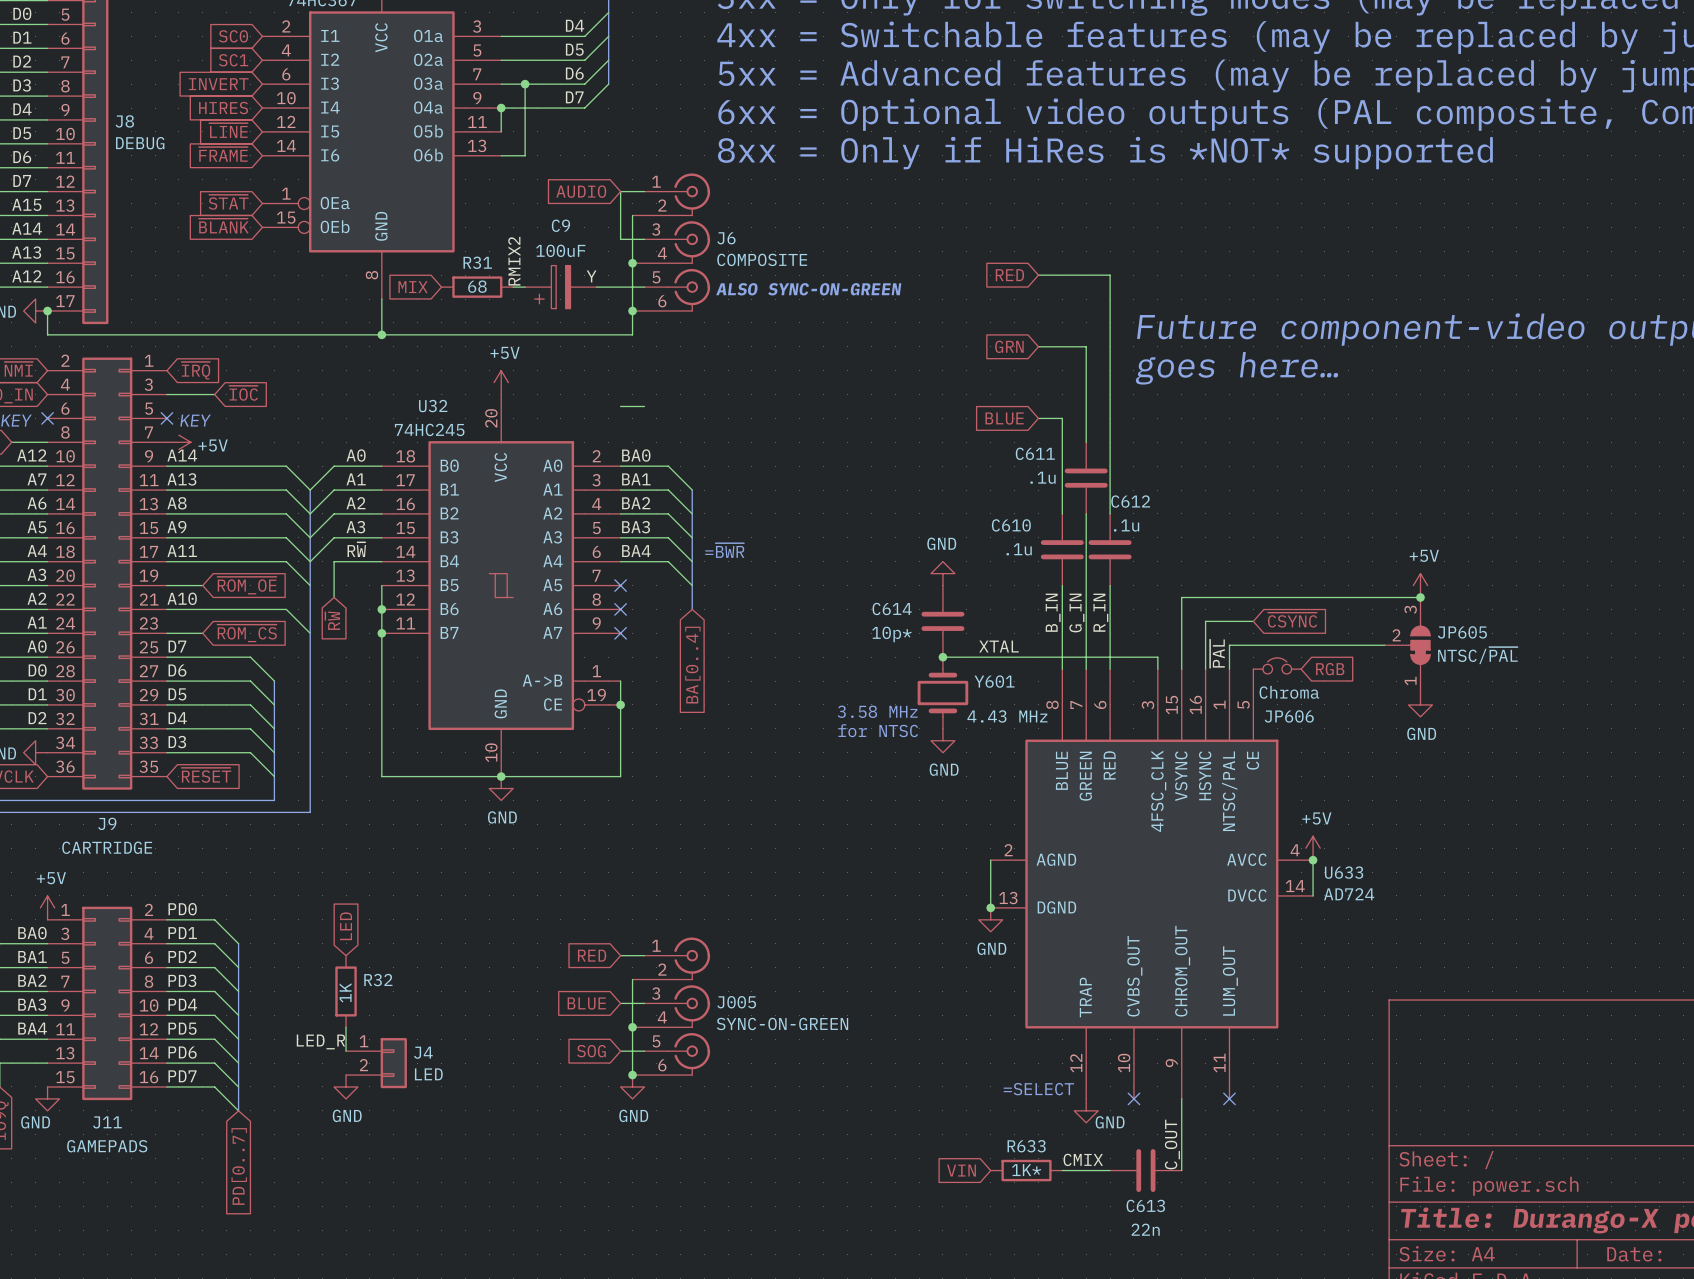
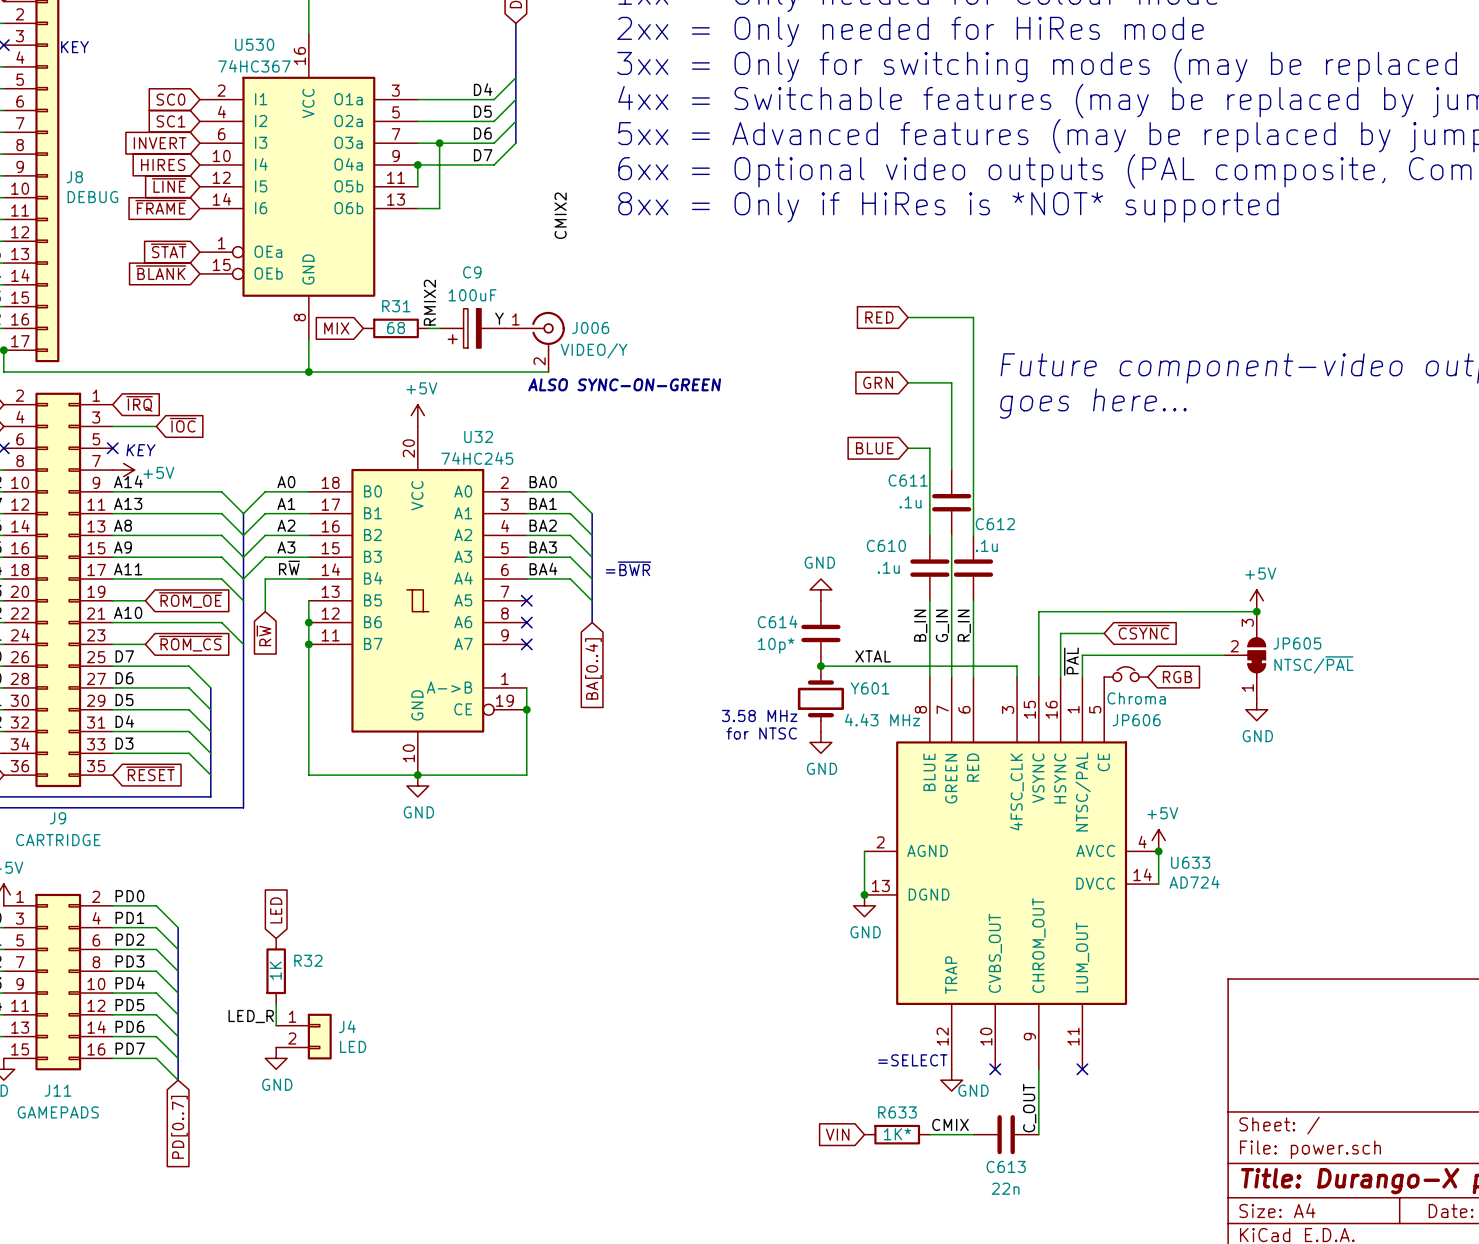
label: none -> CMIX2 (560, 215)
global label: AUDIO (581, 191) -> none
wire: (644, 191) (620, 191) (620, 239) (644, 239) -> none
wire: (632, 215) (632, 334) -> (548, 371) (537, 371)
J6: COMPOSITE (671, 242) -> none
junction: (632, 263) -> none
text position: ALSO SYNC-ON-GREEN (808, 289) -> ALSO SYNC-ON-GREEN (624, 384)
J006: none -> VIDEO/Y (534, 341)
junction: (632, 310) -> none
U32 name position: U32 (433, 406) -> U32 (478, 436)
wire: (620, 406) (644, 406) -> none
U32 value position: 74HC245 (429, 429) -> 74HC245 (477, 458)
global label: RED (592, 955) -> none
wire: (620, 955) (644, 955) -> none
wire: (632, 979) (632, 1075) -> none
global label: BLUE (586, 1003) -> none
wire: (620, 1003) (644, 1003) -> none
J005: SYNC-ON-GREEN (671, 1006) -> none
junction: (632, 1027) -> none
global label: SOG (591, 1051) -> none
wire: (620, 1051) (644, 1051) -> none
junction: (632, 1075) -> none
power symbol: GND (632, 1086) -> none

